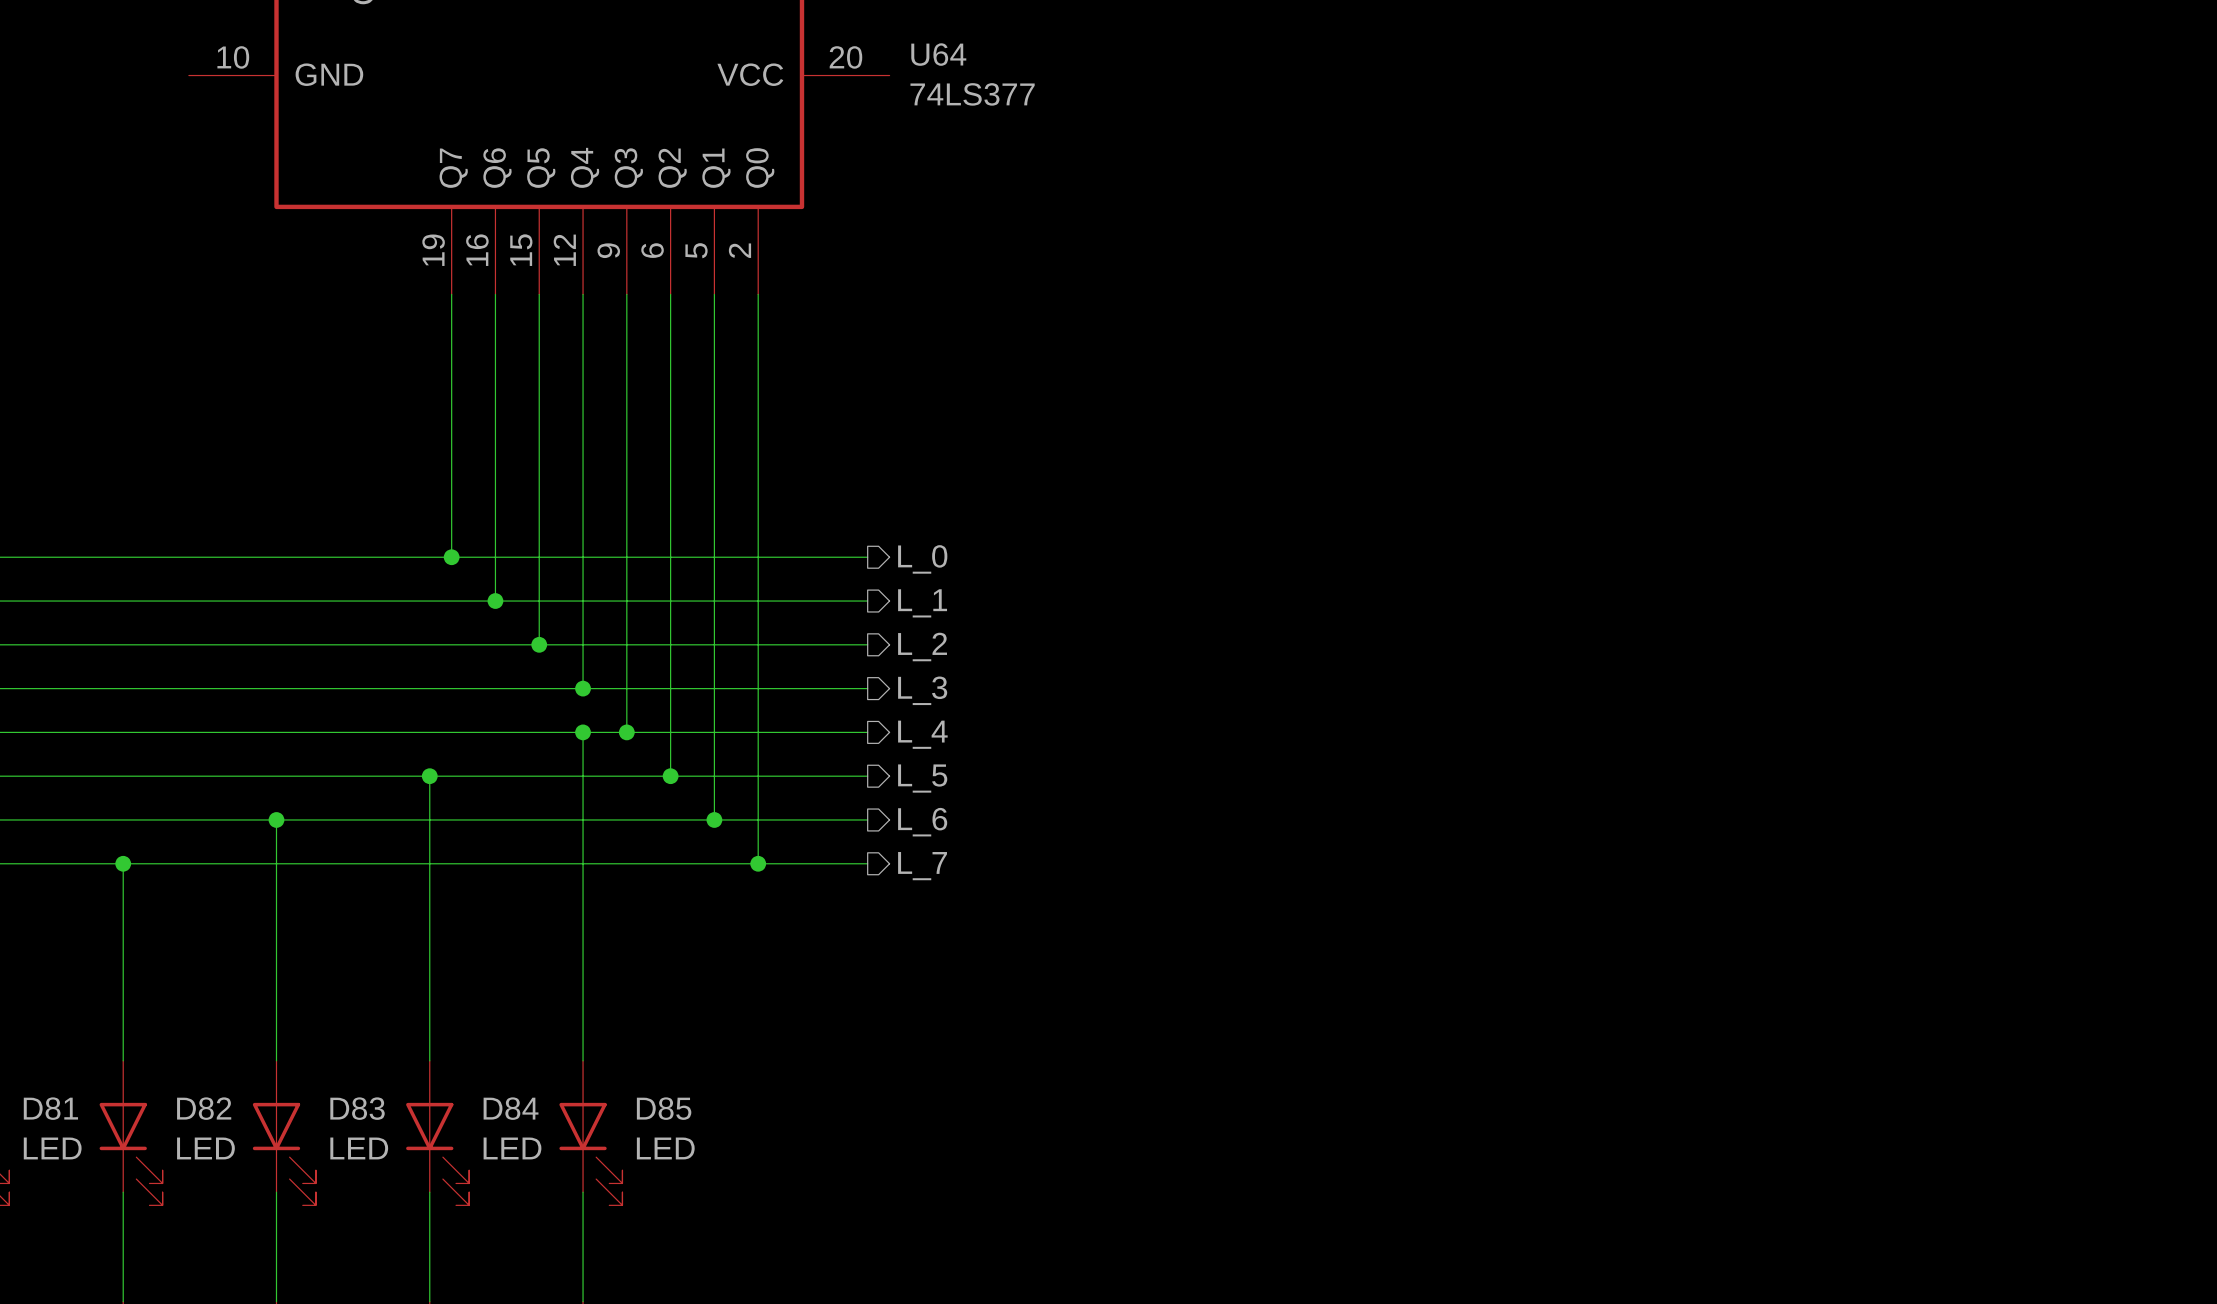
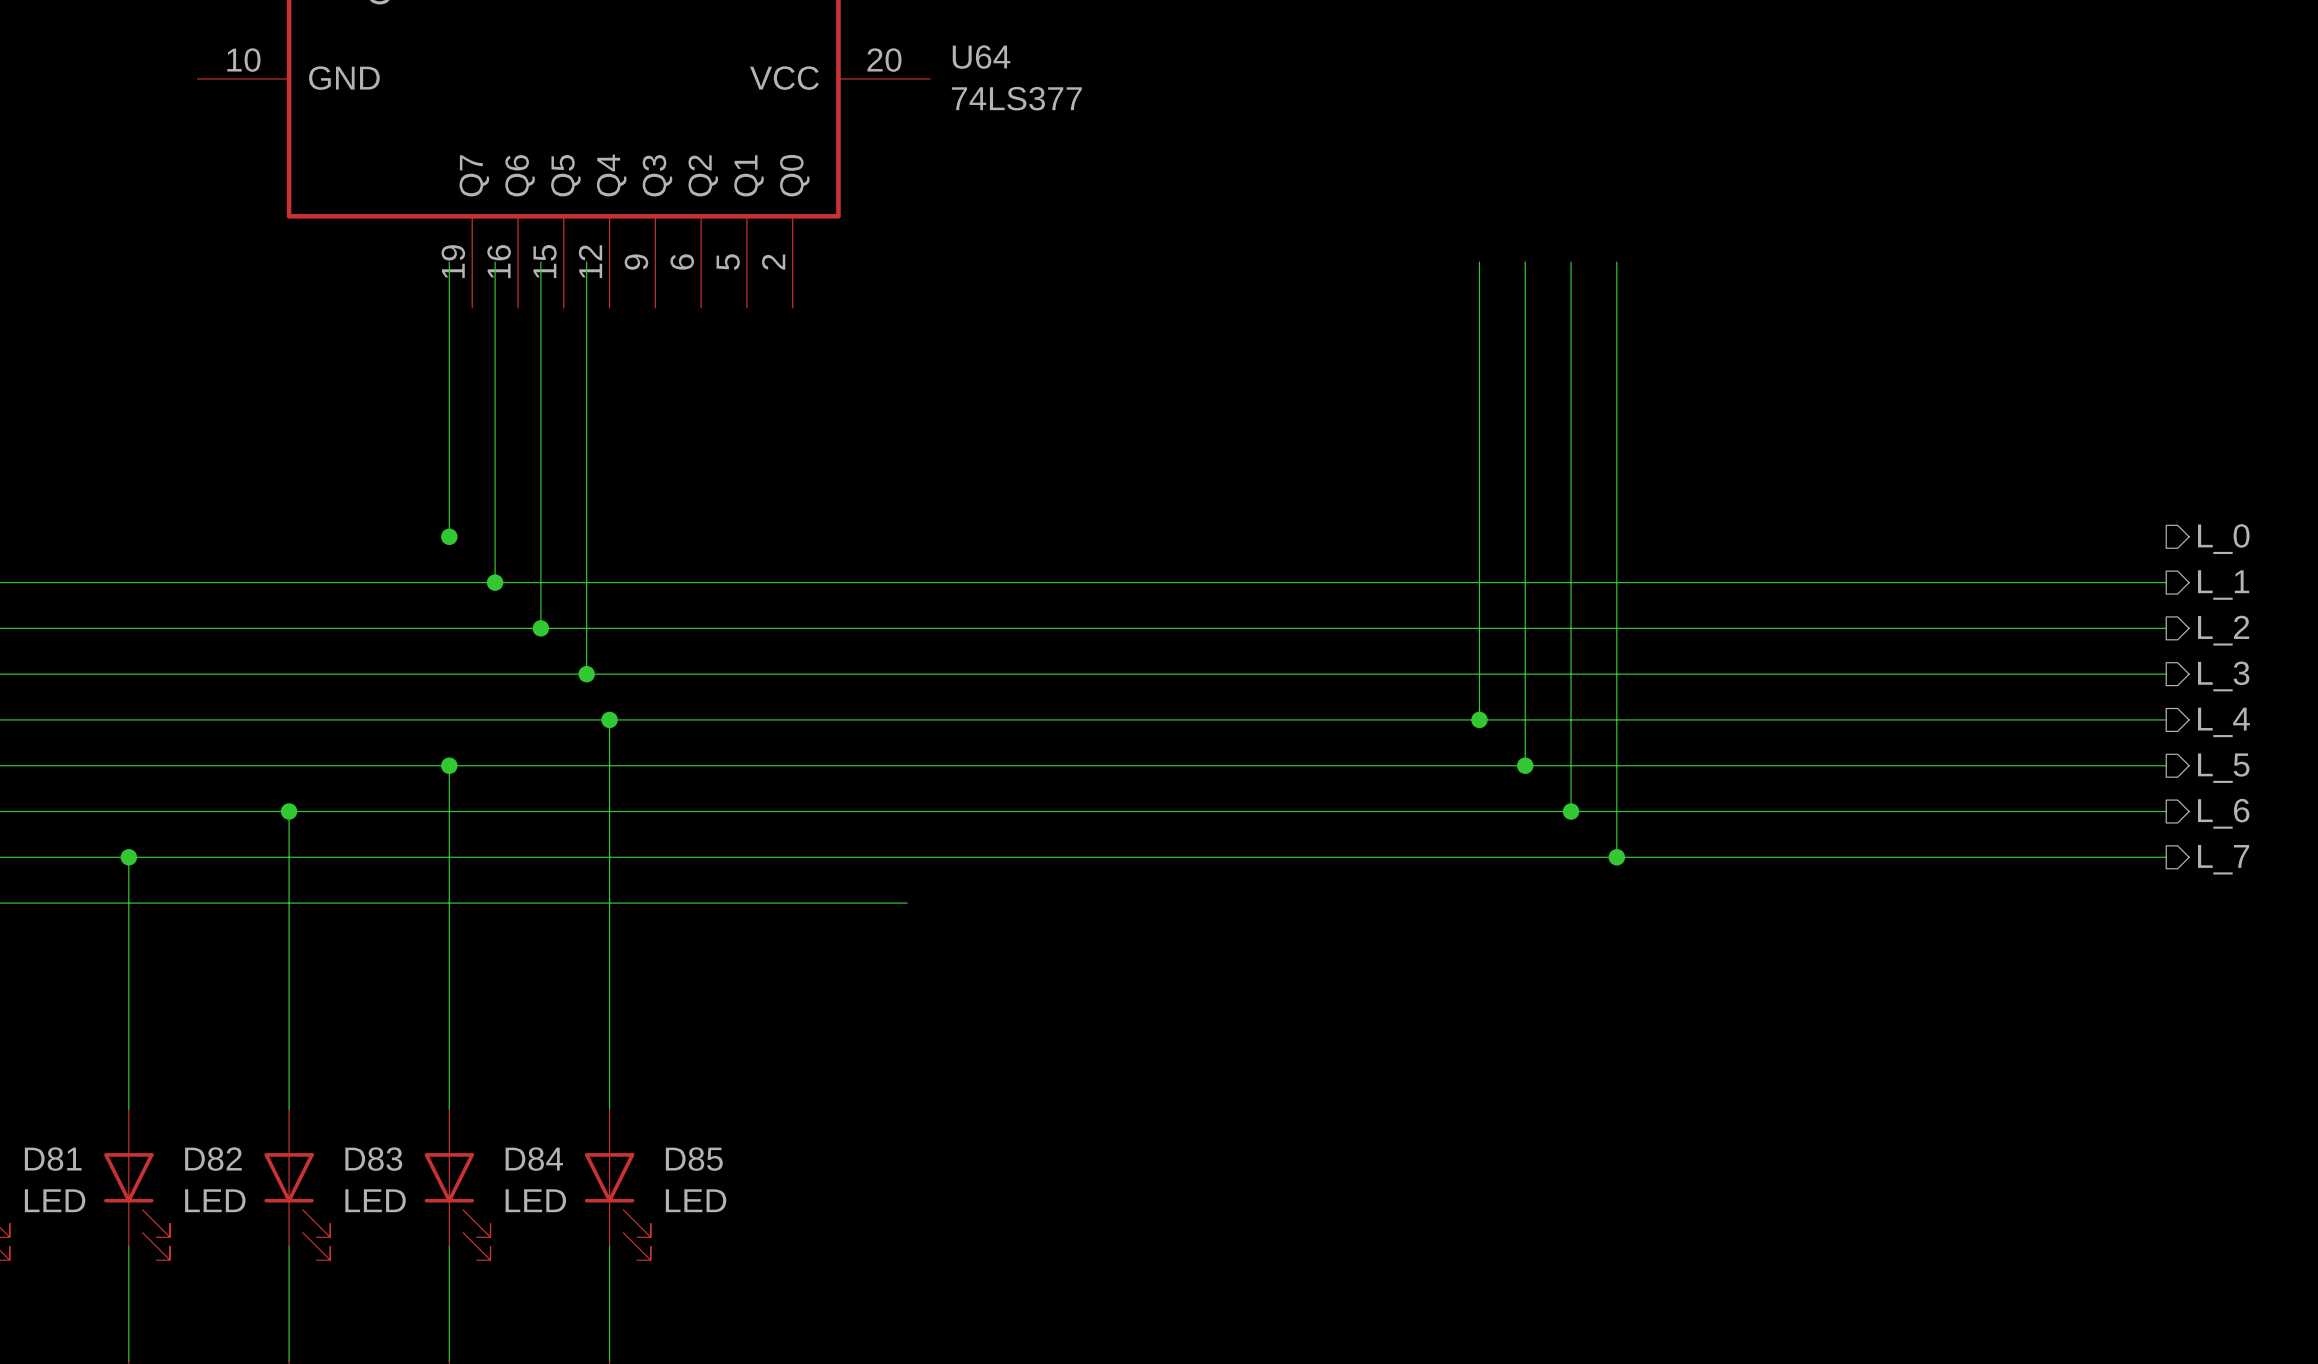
wire: none -> (586, 262) (586, 674)
wire: none -> (1479, 262) (1479, 719)
wire: none -> (1525, 262) (1525, 765)
wire: none -> (1571, 262) (1571, 811)
wire: none -> (1616, 262) (1616, 857)
wire: (451, 294) (451, 557) -> (449, 262) (449, 536)
wire: (495, 294) (495, 601) -> (495, 262) (495, 582)
wire: (539, 294) (539, 644) -> (540, 262) (540, 628)
wire: (583, 294) (583, 688) -> (609, 765) (609, 719)
wire: (626, 294) (626, 732) -> none
wire: (670, 294) (670, 776) -> none
wire: (714, 294) (714, 819) -> none
wire: (758, 294) (758, 863) -> none
junction: none -> (449, 536)
hierarchical label: none -> L_0 (2223, 539)
junction position: (451, 557) -> (495, 582)
wire: none -> (907, 582) (2166, 582)
hierarchical label: L_0 (922, 559) -> none
hierarchical label: none -> L_1 (2223, 585)
junction position: (495, 601) -> (540, 628)
wire: none -> (907, 628) (2166, 628)
hierarchical label: L_1 (922, 603) -> none
hierarchical label: none -> L_2 (2223, 630)
junction position: (539, 644) -> (586, 674)
wire: none -> (907, 674) (2166, 674)
hierarchical label: L_2 (922, 646) -> none
hierarchical label: none -> L_3 (2223, 676)
wire: none -> (907, 719) (2166, 719)
junction: none -> (1479, 719)
hierarchical label: L_3 (922, 690) -> none
hierarchical label: none -> L_4 (2223, 722)
wire: none -> (449, 765) (449, 811)
junction: (583, 732) -> none
junction: (626, 732) -> none
wire: none -> (907, 765) (2166, 765)
junction: none -> (1525, 765)
hierarchical label: L_4 (922, 734) -> none
hierarchical label: none -> L_5 (2223, 768)
wire: none -> (289, 811) (289, 857)
junction position: (429, 776) -> (449, 765)
junction: (670, 776) -> none
wire: none -> (907, 811) (2166, 811)
junction: none -> (1571, 811)
hierarchical label: L_5 (922, 778) -> none
hierarchical label: none -> L_6 (2223, 813)
wire: none -> (128, 857) (128, 903)
junction position: (276, 819) -> (289, 811)
junction: (714, 819) -> none
wire: none -> (907, 857) (2166, 857)
junction: none -> (1616, 857)
hierarchical label: L_6 (922, 822) -> none
hierarchical label: none -> L_7 (2223, 859)
junction position: (123, 863) -> (128, 857)
junction: (758, 863) -> none
hierarchical label: L_7 (922, 866) -> none

